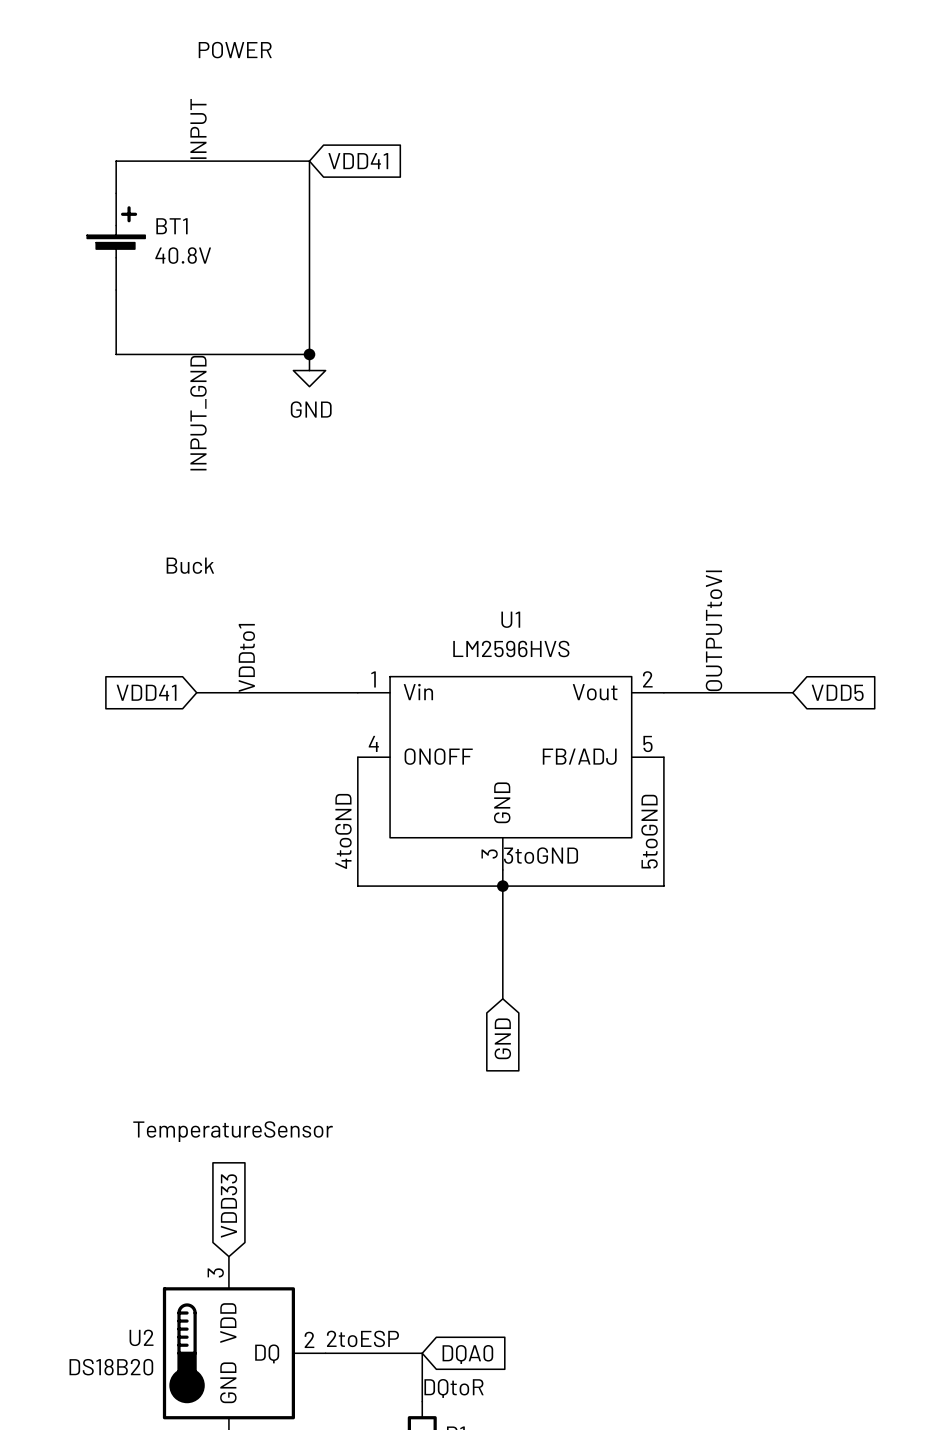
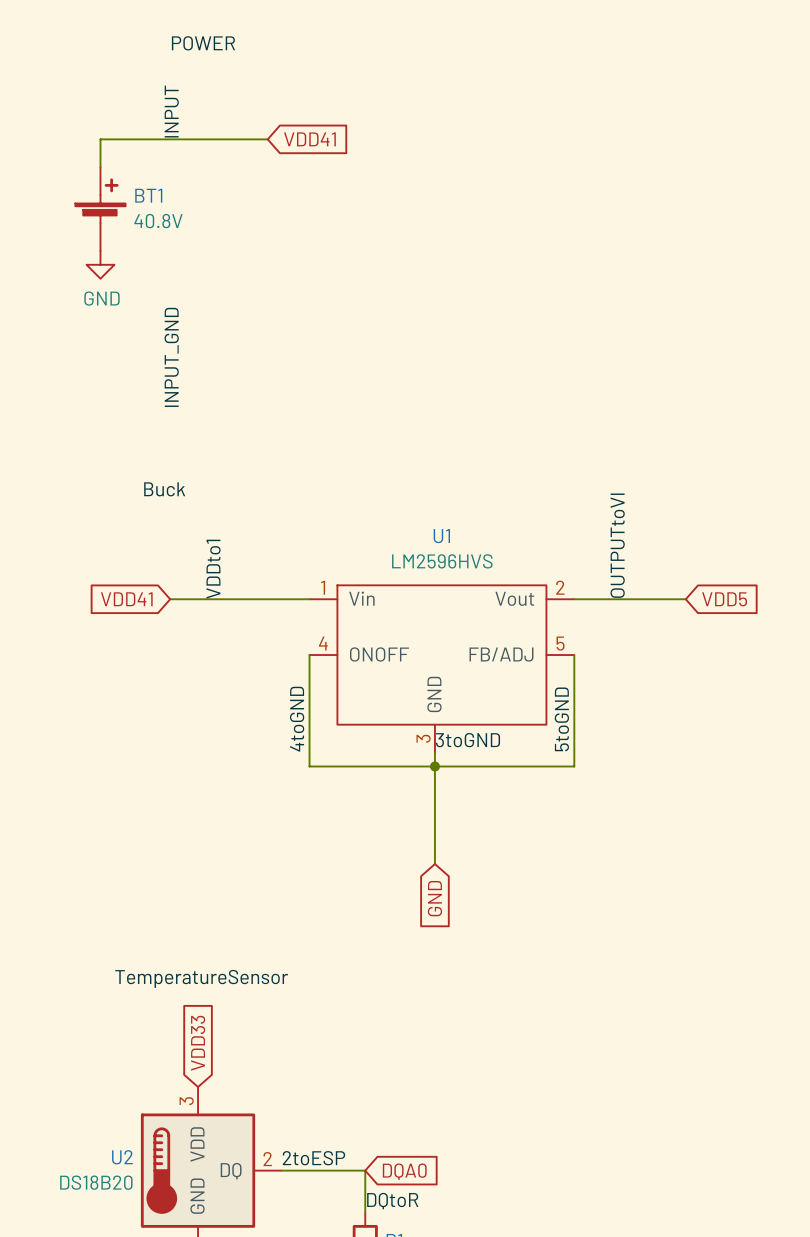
wire: (309, 161) (309, 354) (116, 354) (116, 290) -> none
junction: (309, 354) -> none
power symbol position: GND (309, 370) -> GND (100, 264)

